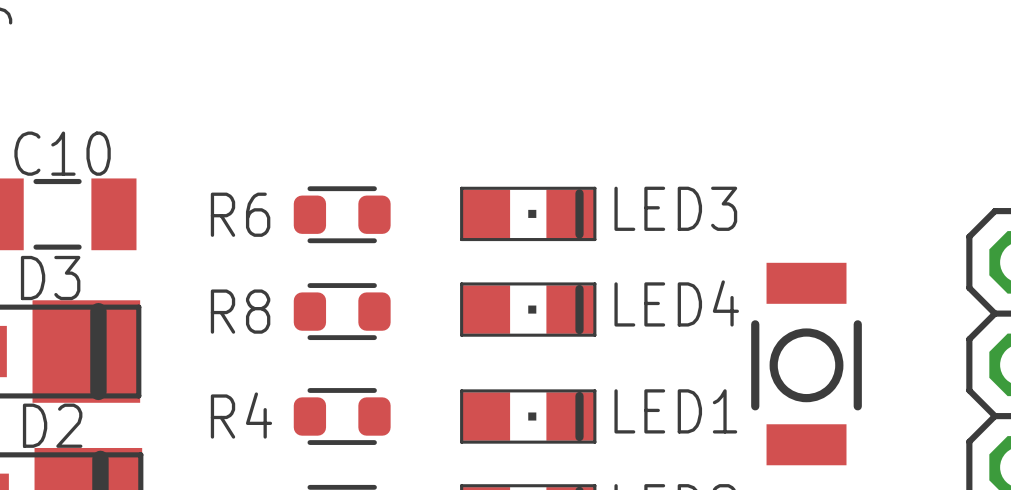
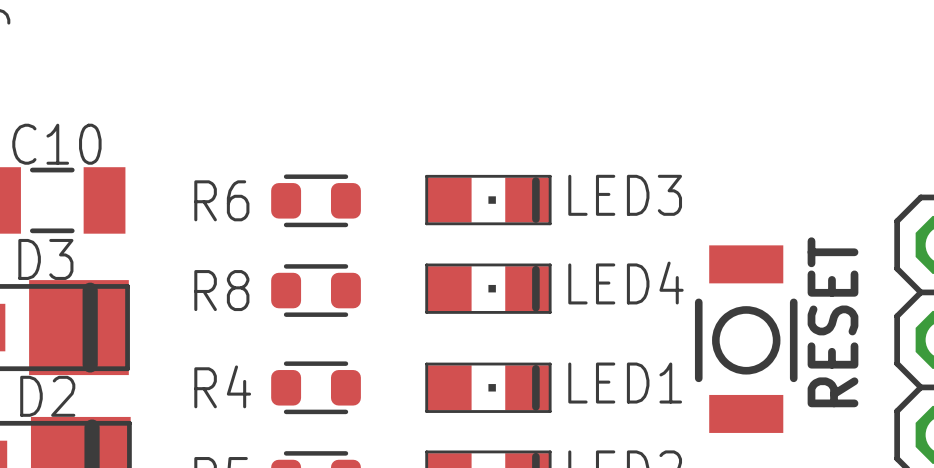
text: none -> RESET (833, 322)

